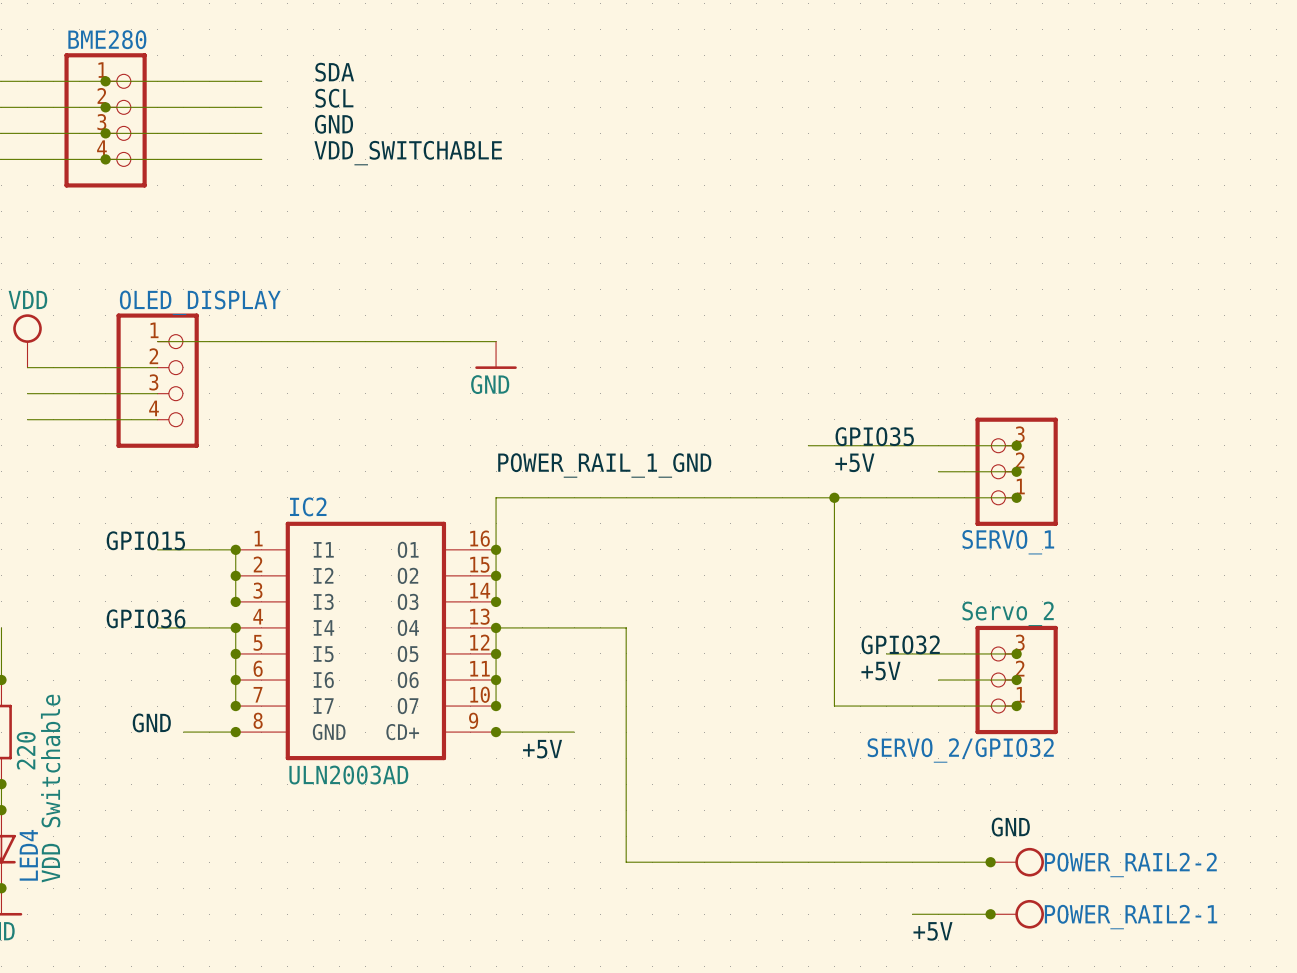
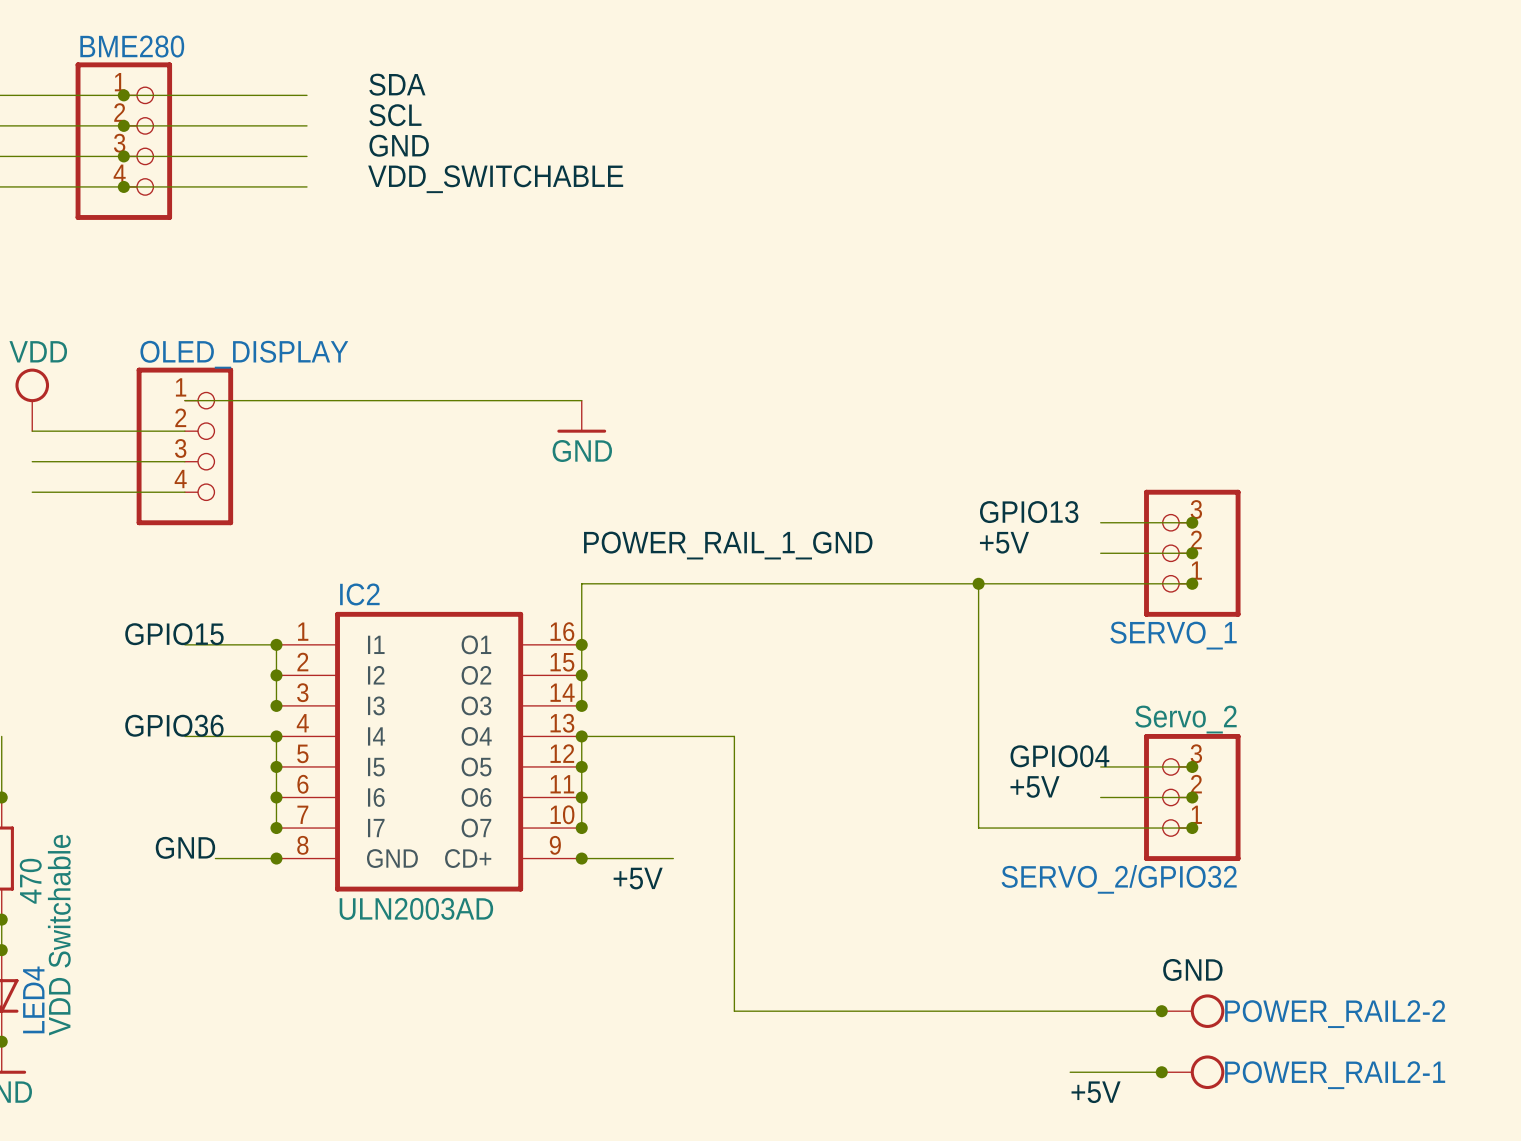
label: GPIO35 (874, 436) -> GPIO13 (1029, 512)
wire: (808, 445) (938, 445) -> none
label: GPIO32 (900, 644) -> GPIO04 (1059, 756)
wire: (886, 653) (938, 653) -> none
part value: 220 (26, 750) -> 470 (30, 881)

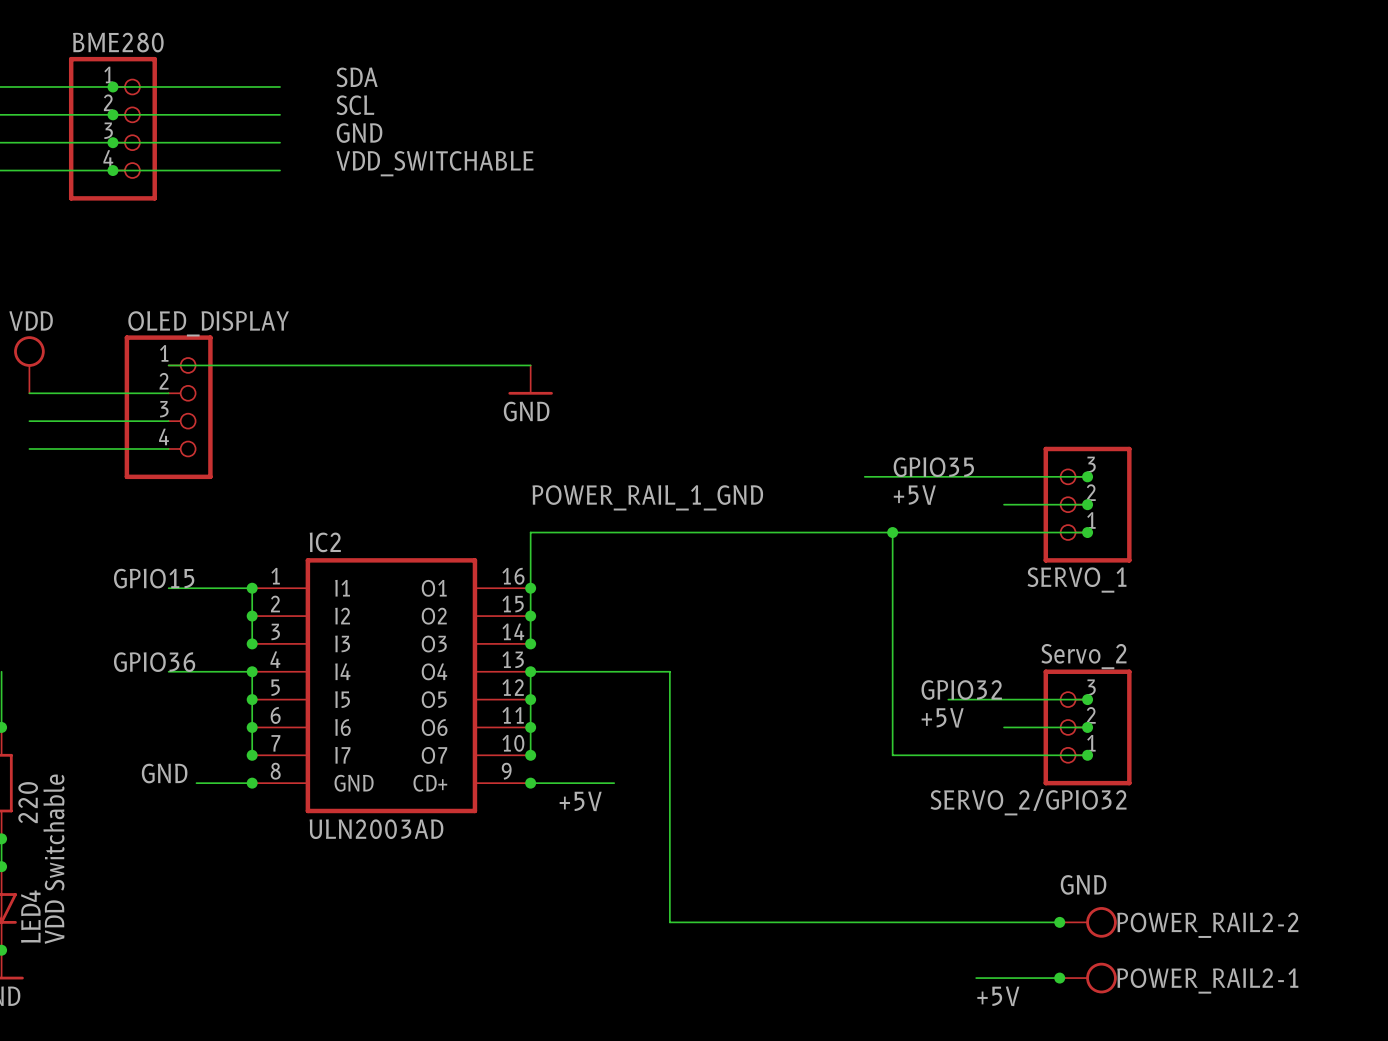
label: GPIO13 (1029, 512) -> GPIO35 (933, 467)
wire: none -> (864, 476) (1004, 476)
label: GPIO04 (1059, 756) -> GPIO32 (961, 689)
wire: none -> (948, 699) (1004, 699)
part value: 470 (30, 881) -> 220 (28, 802)

